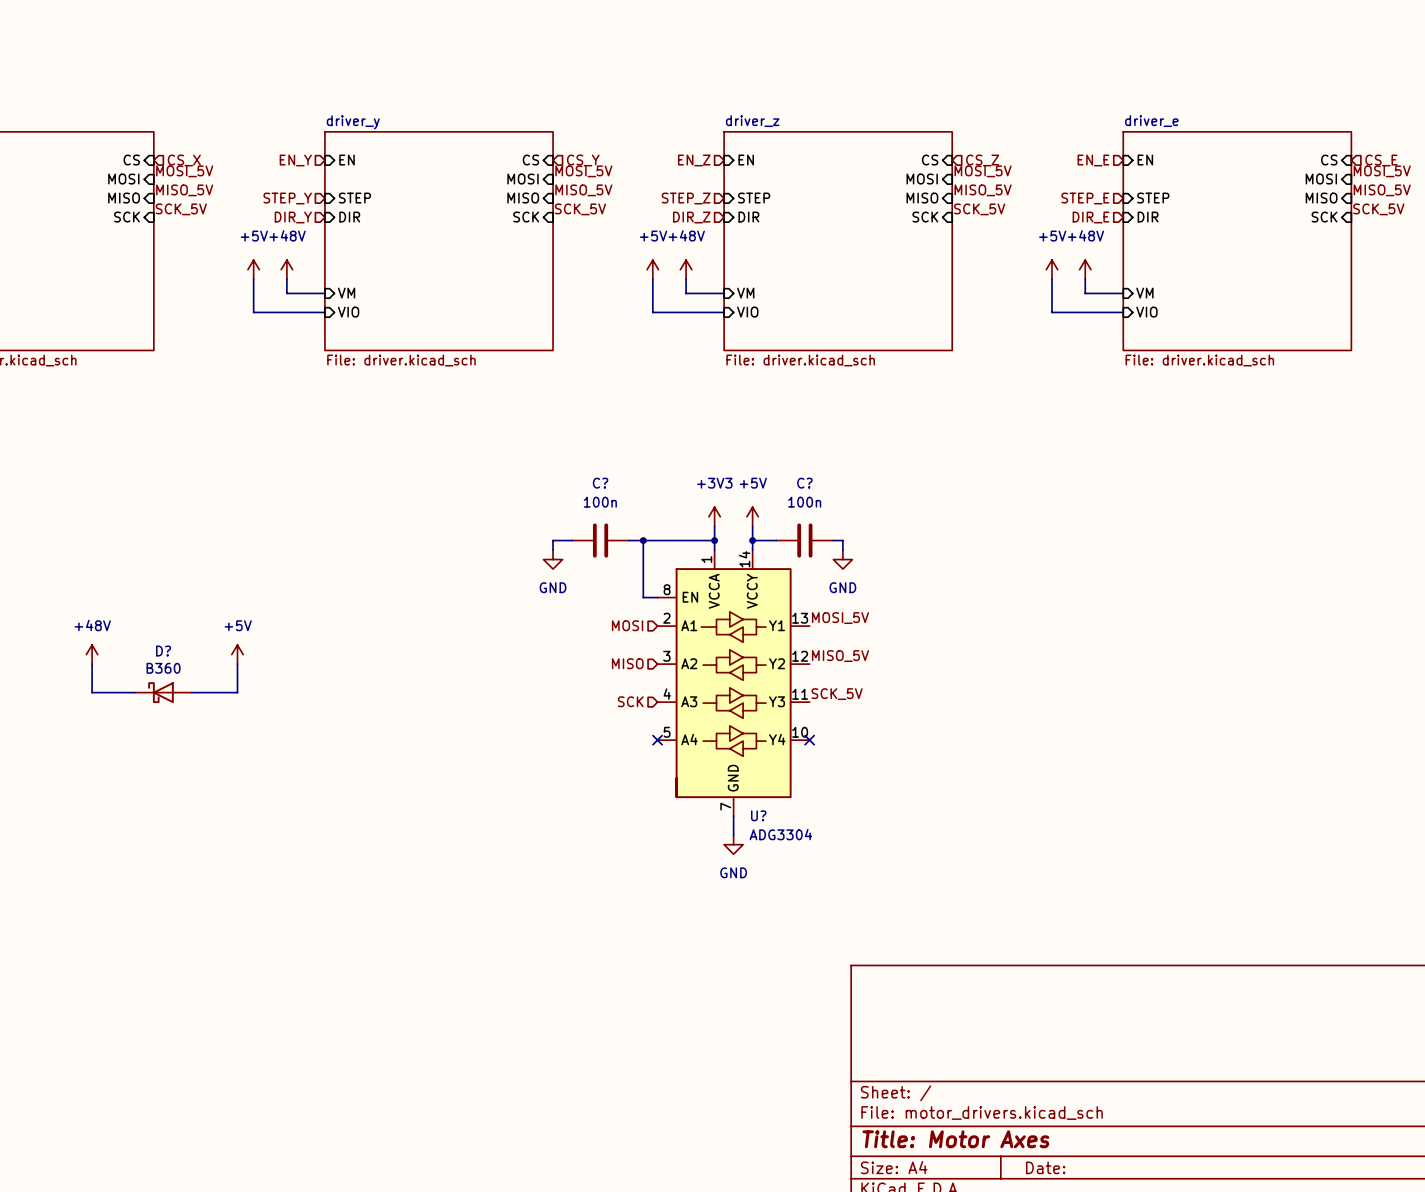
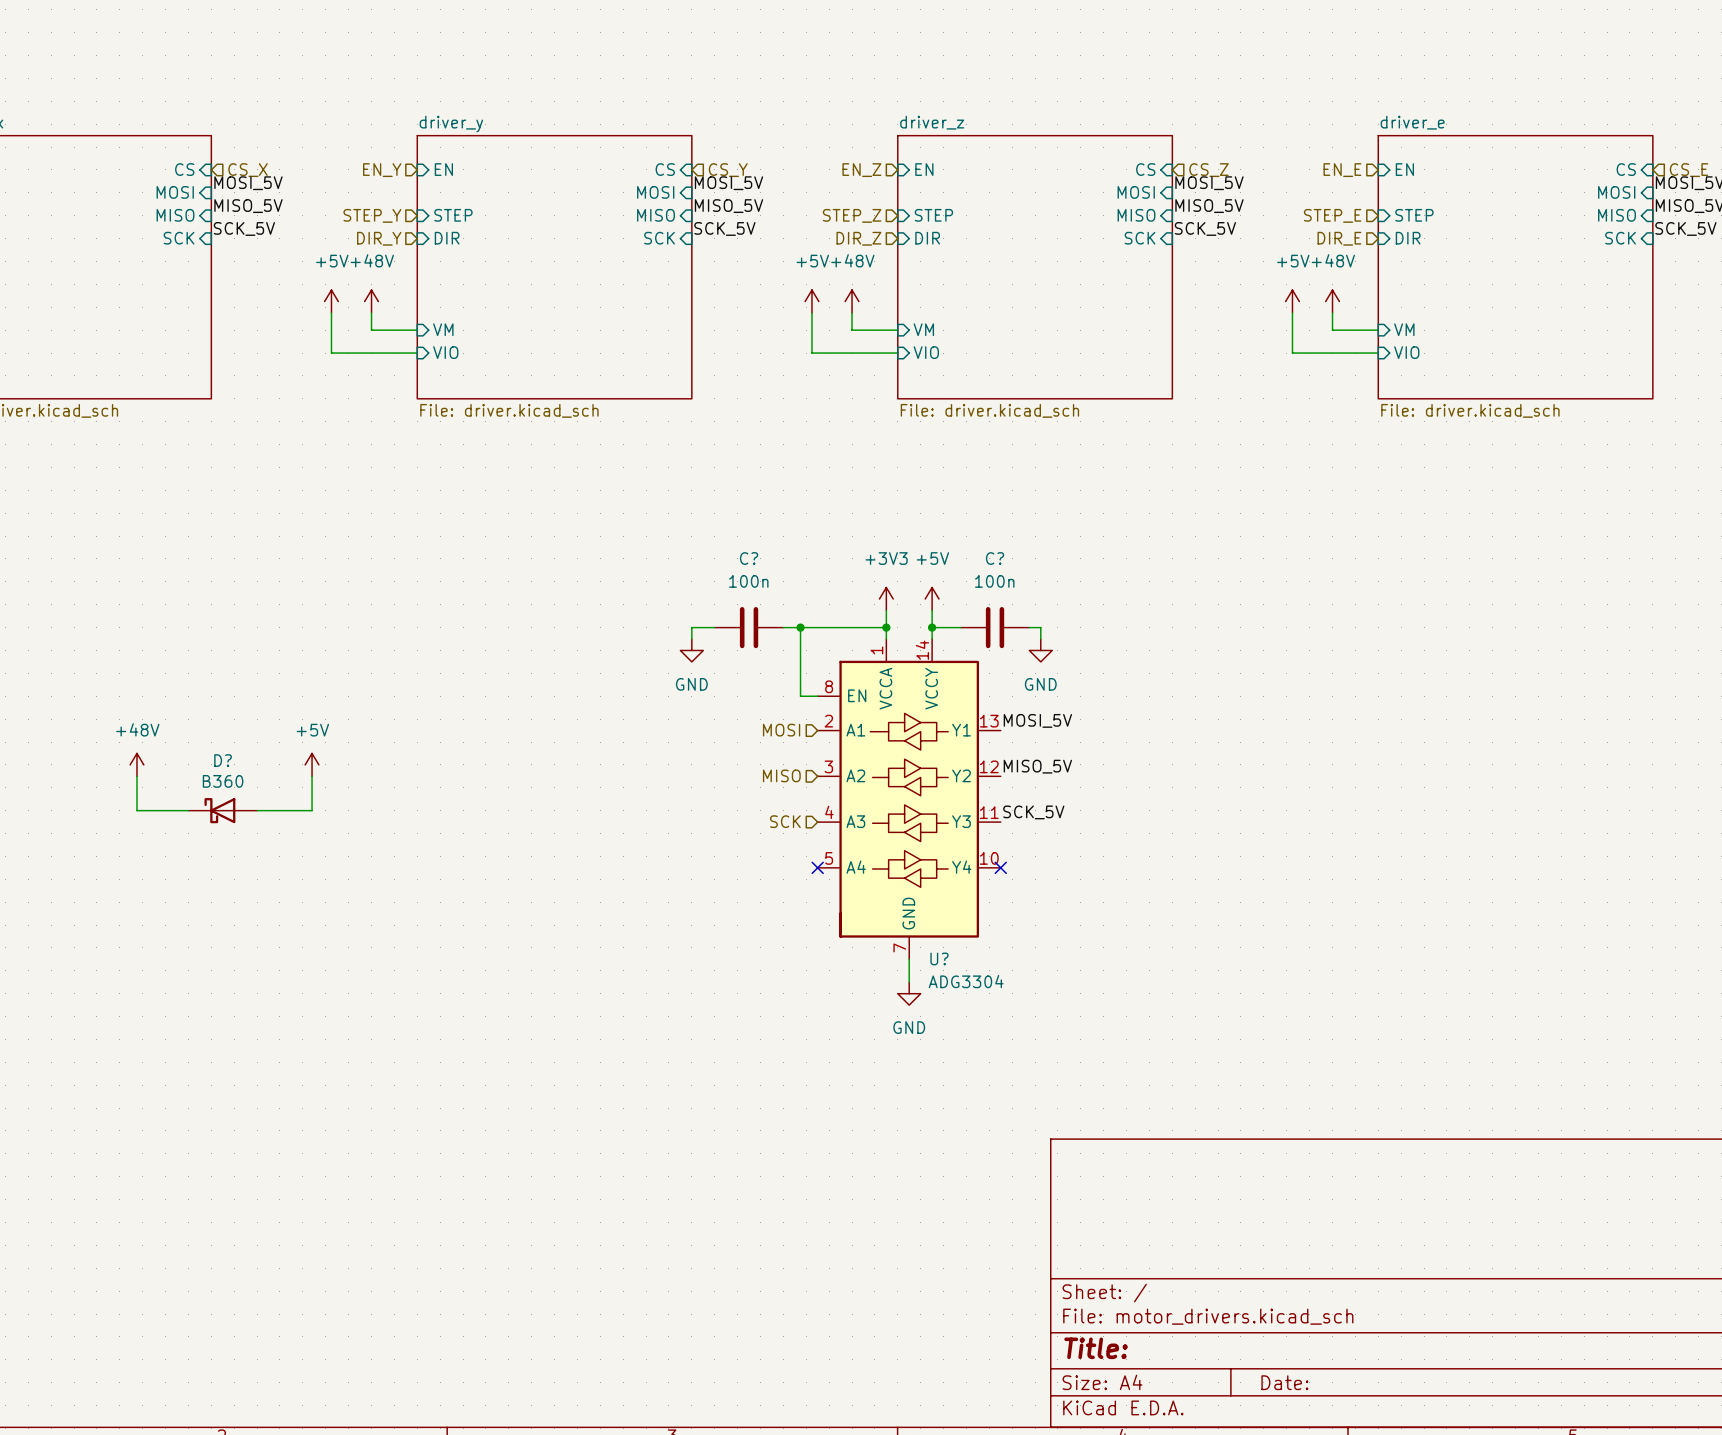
title block: Title: Motor Axes (955, 1139) -> Title: (1096, 1348)

